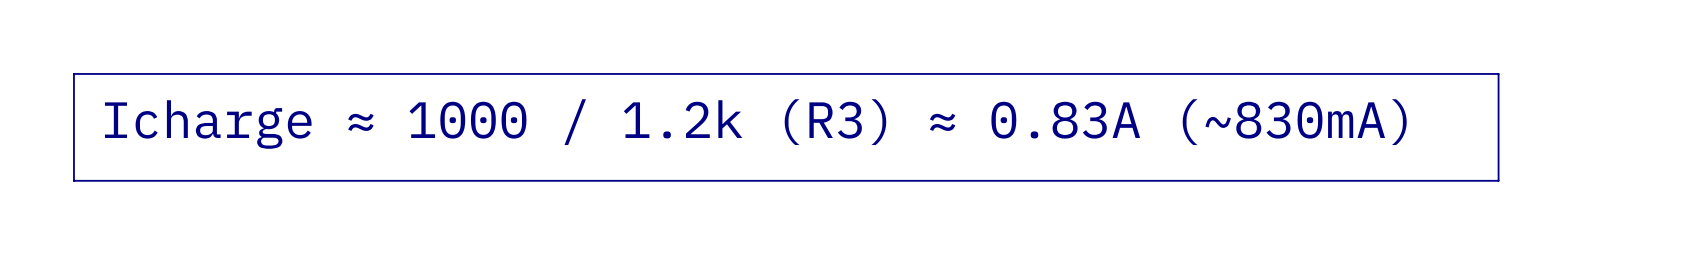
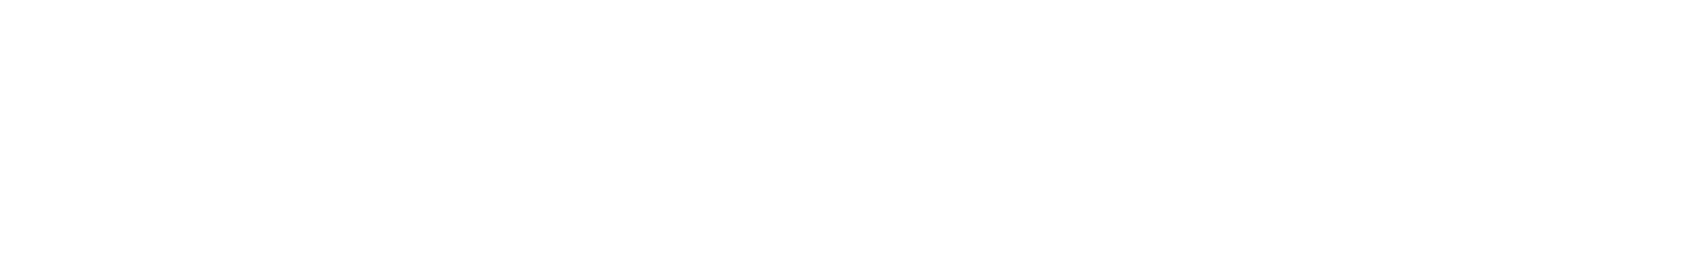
line: (73, 73) (1498, 73) (1498, 180) (73, 180) (73, 73) -> none
text: Icharge ≈ 1000 / 1.2k (R3) ≈ 0.83A (~830mA) (755, 124) -> none

